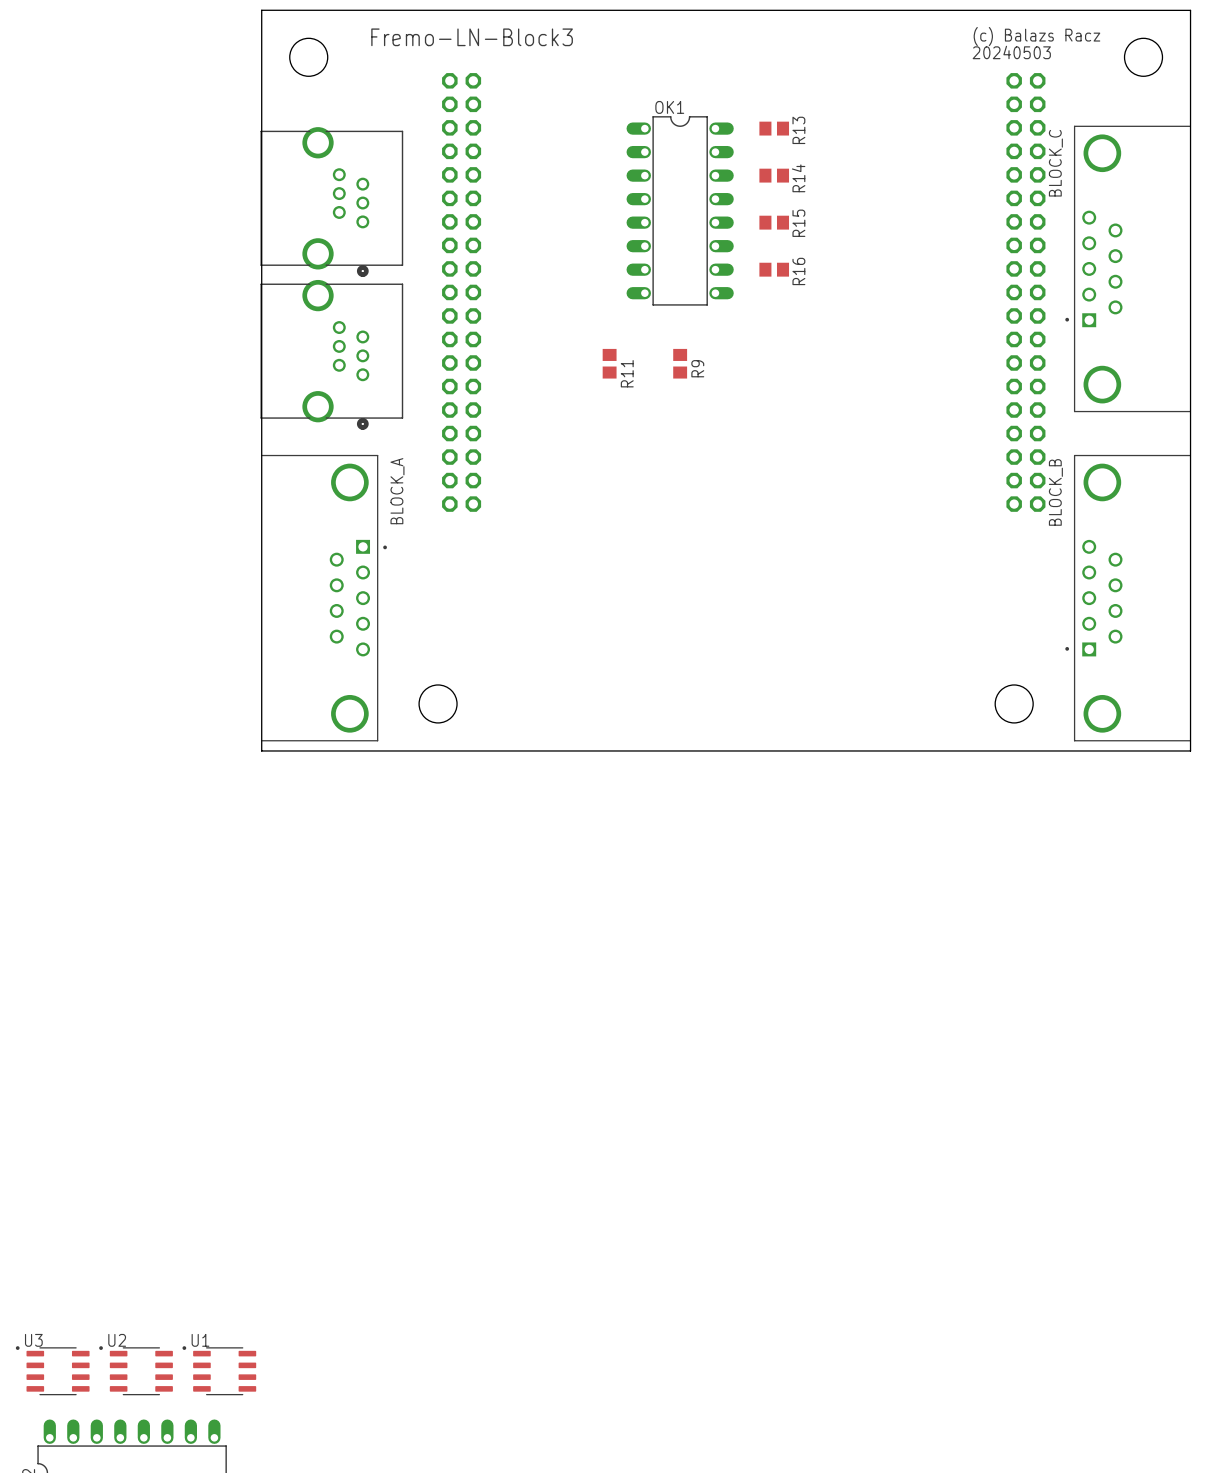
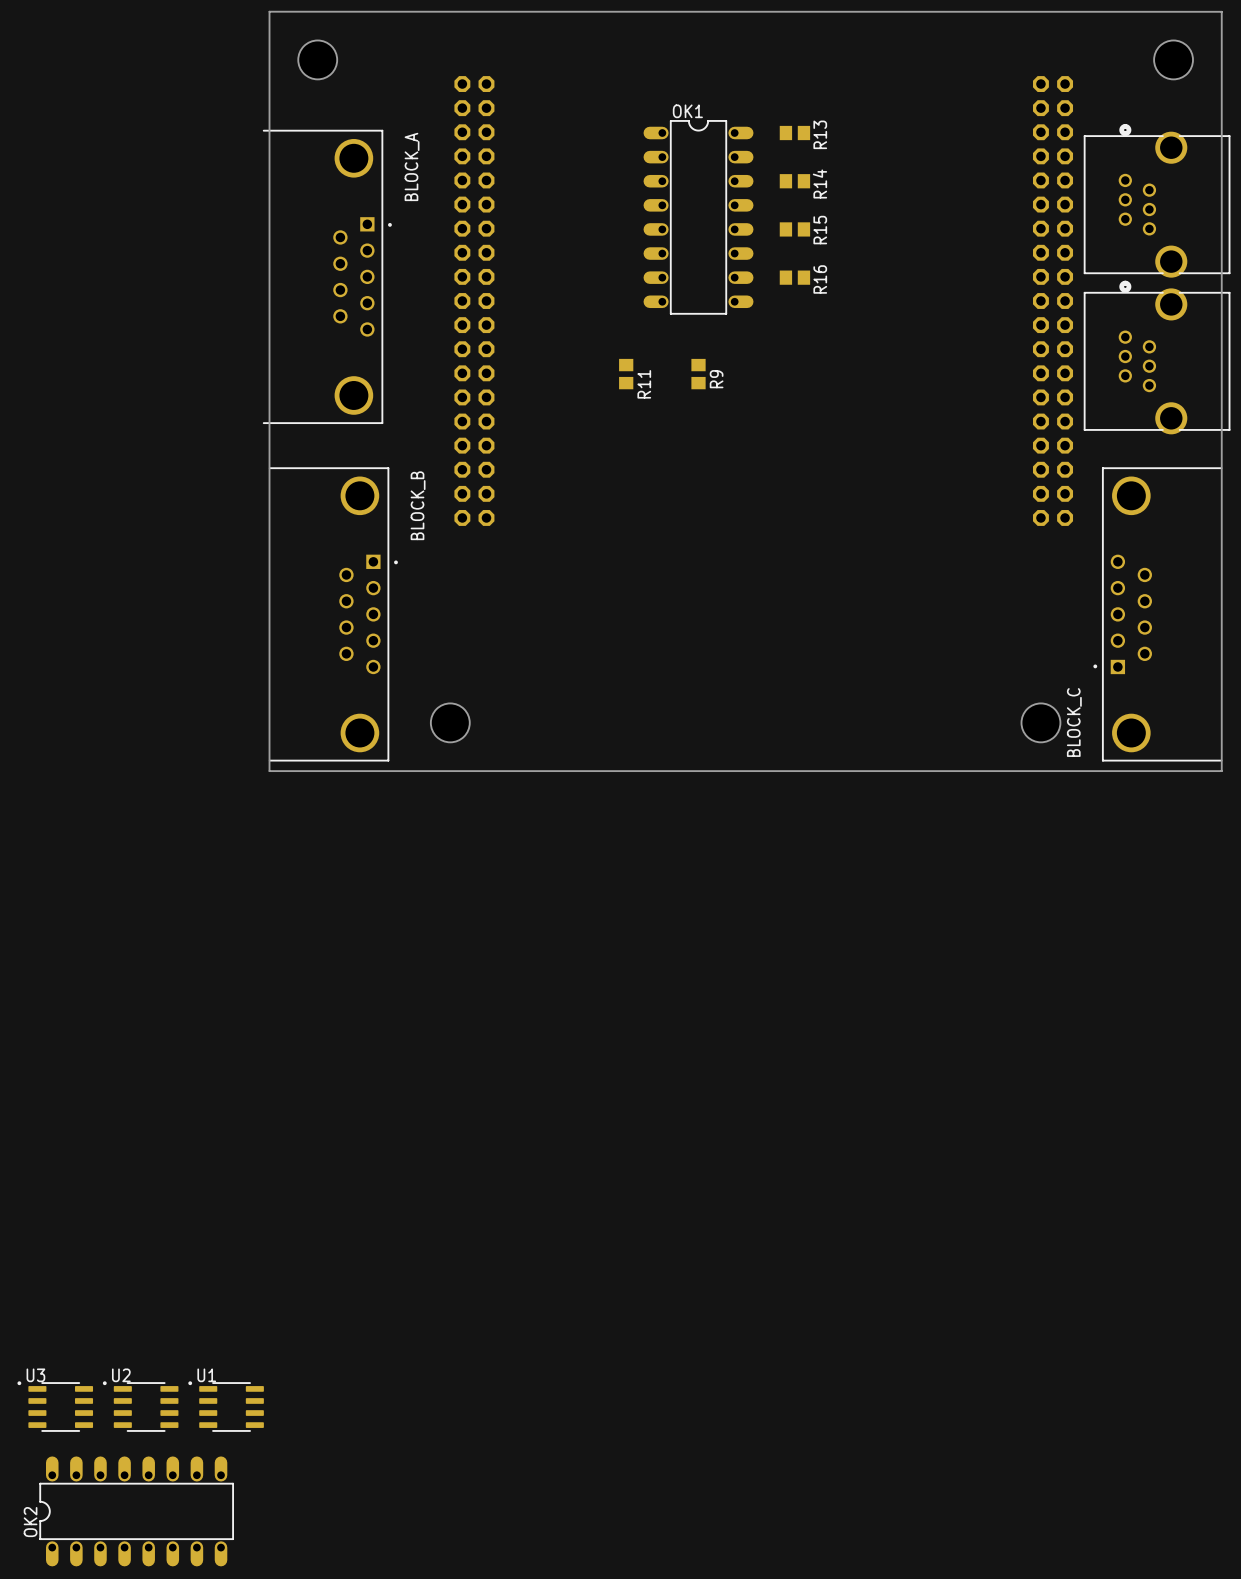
text: (c) Balazs Racz (1036, 36) -> none
text: Fremo-LN-Block3 (472, 37) -> none
text: 20240503 (1011, 52) -> none
part: none -> (1157, 200)
part: (331, 202) -> none
BLOCK_A: none -> (327, 276)
BLOCK_C: (1128, 268) -> none
part: none -> (1157, 357)
part: (331, 354) -> none
BLOCK_A name: BLOCK_A (397, 491) -> BLOCK_B (418, 505)
BLOCK_B name: BLOCK_B (1055, 492) -> BLOCK_C (1074, 722)

